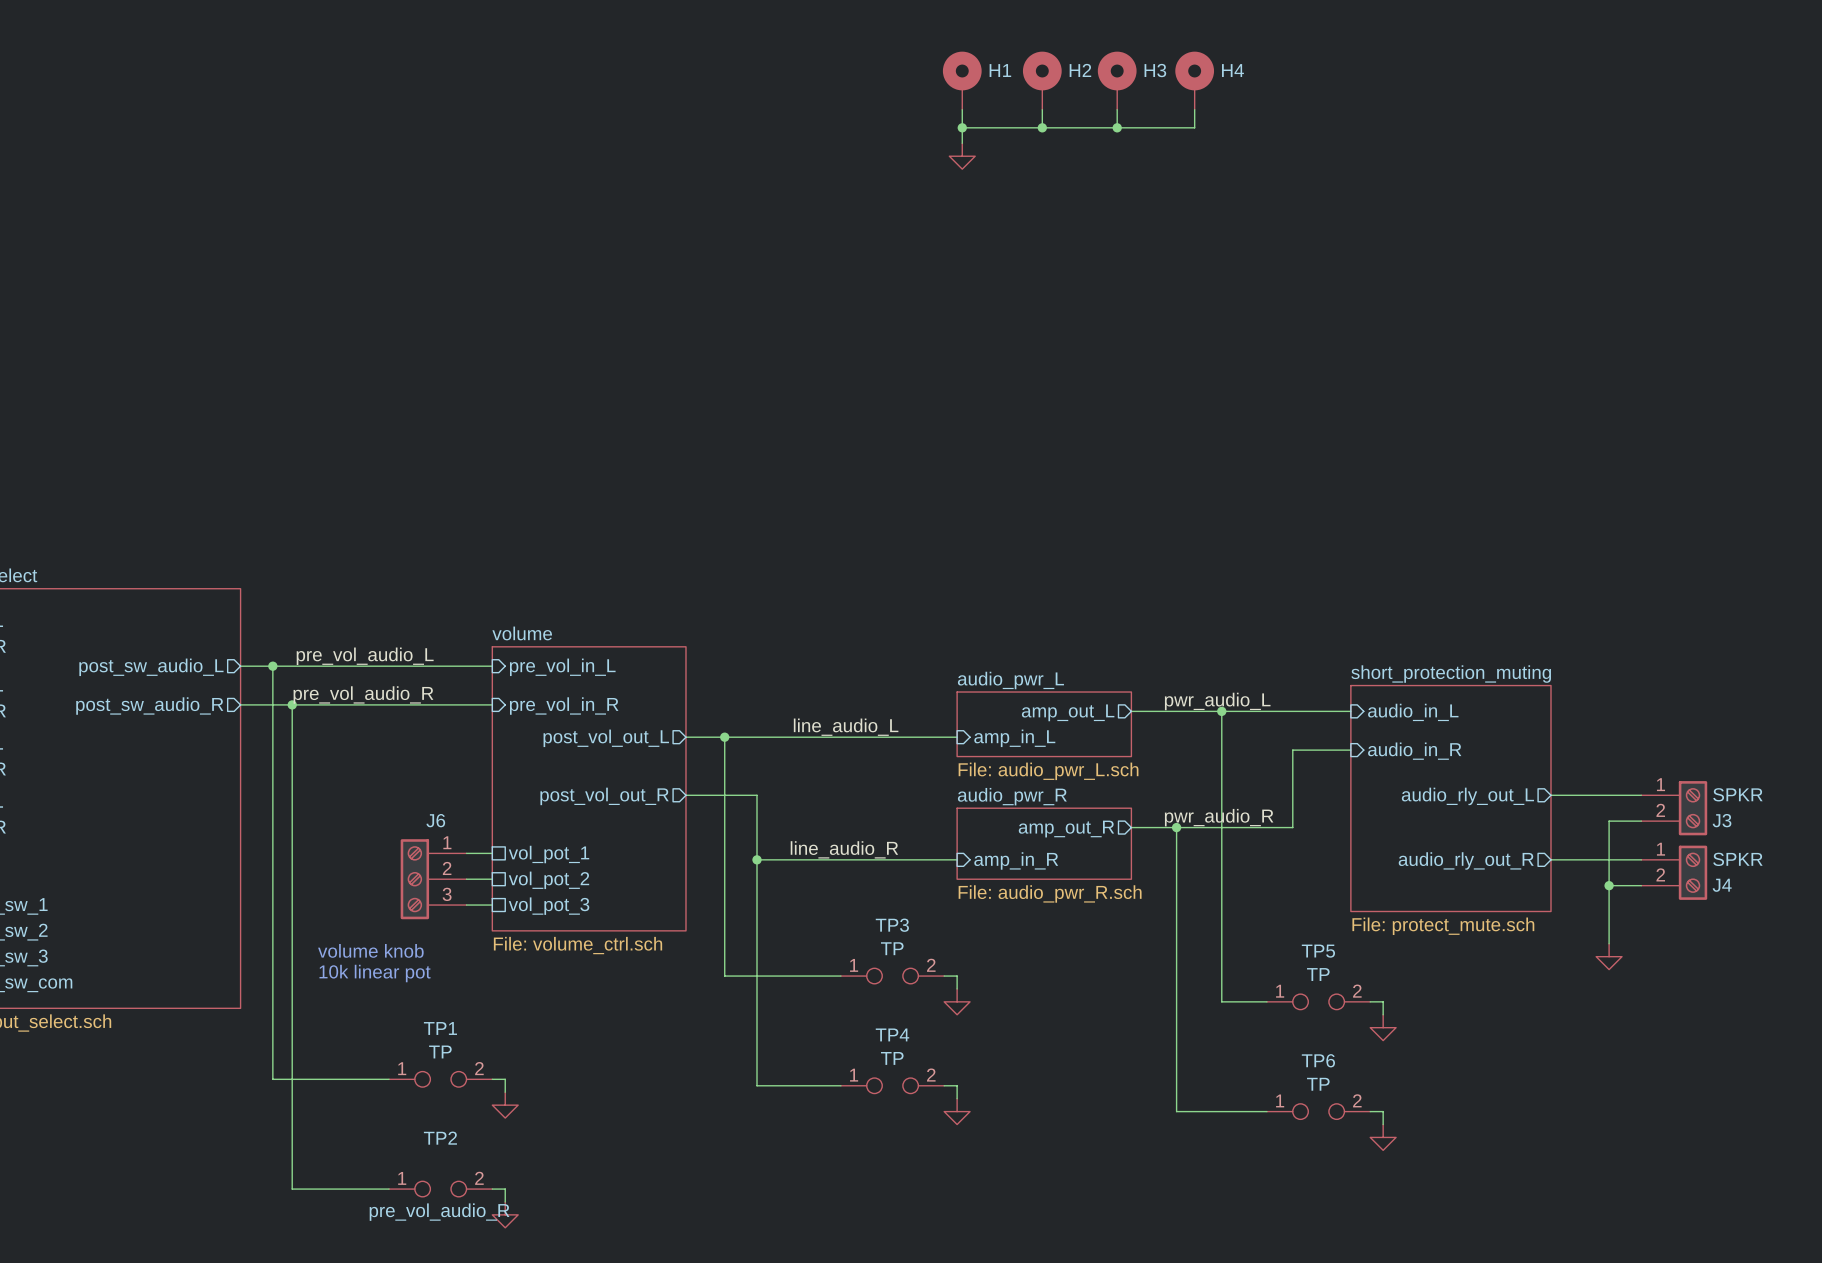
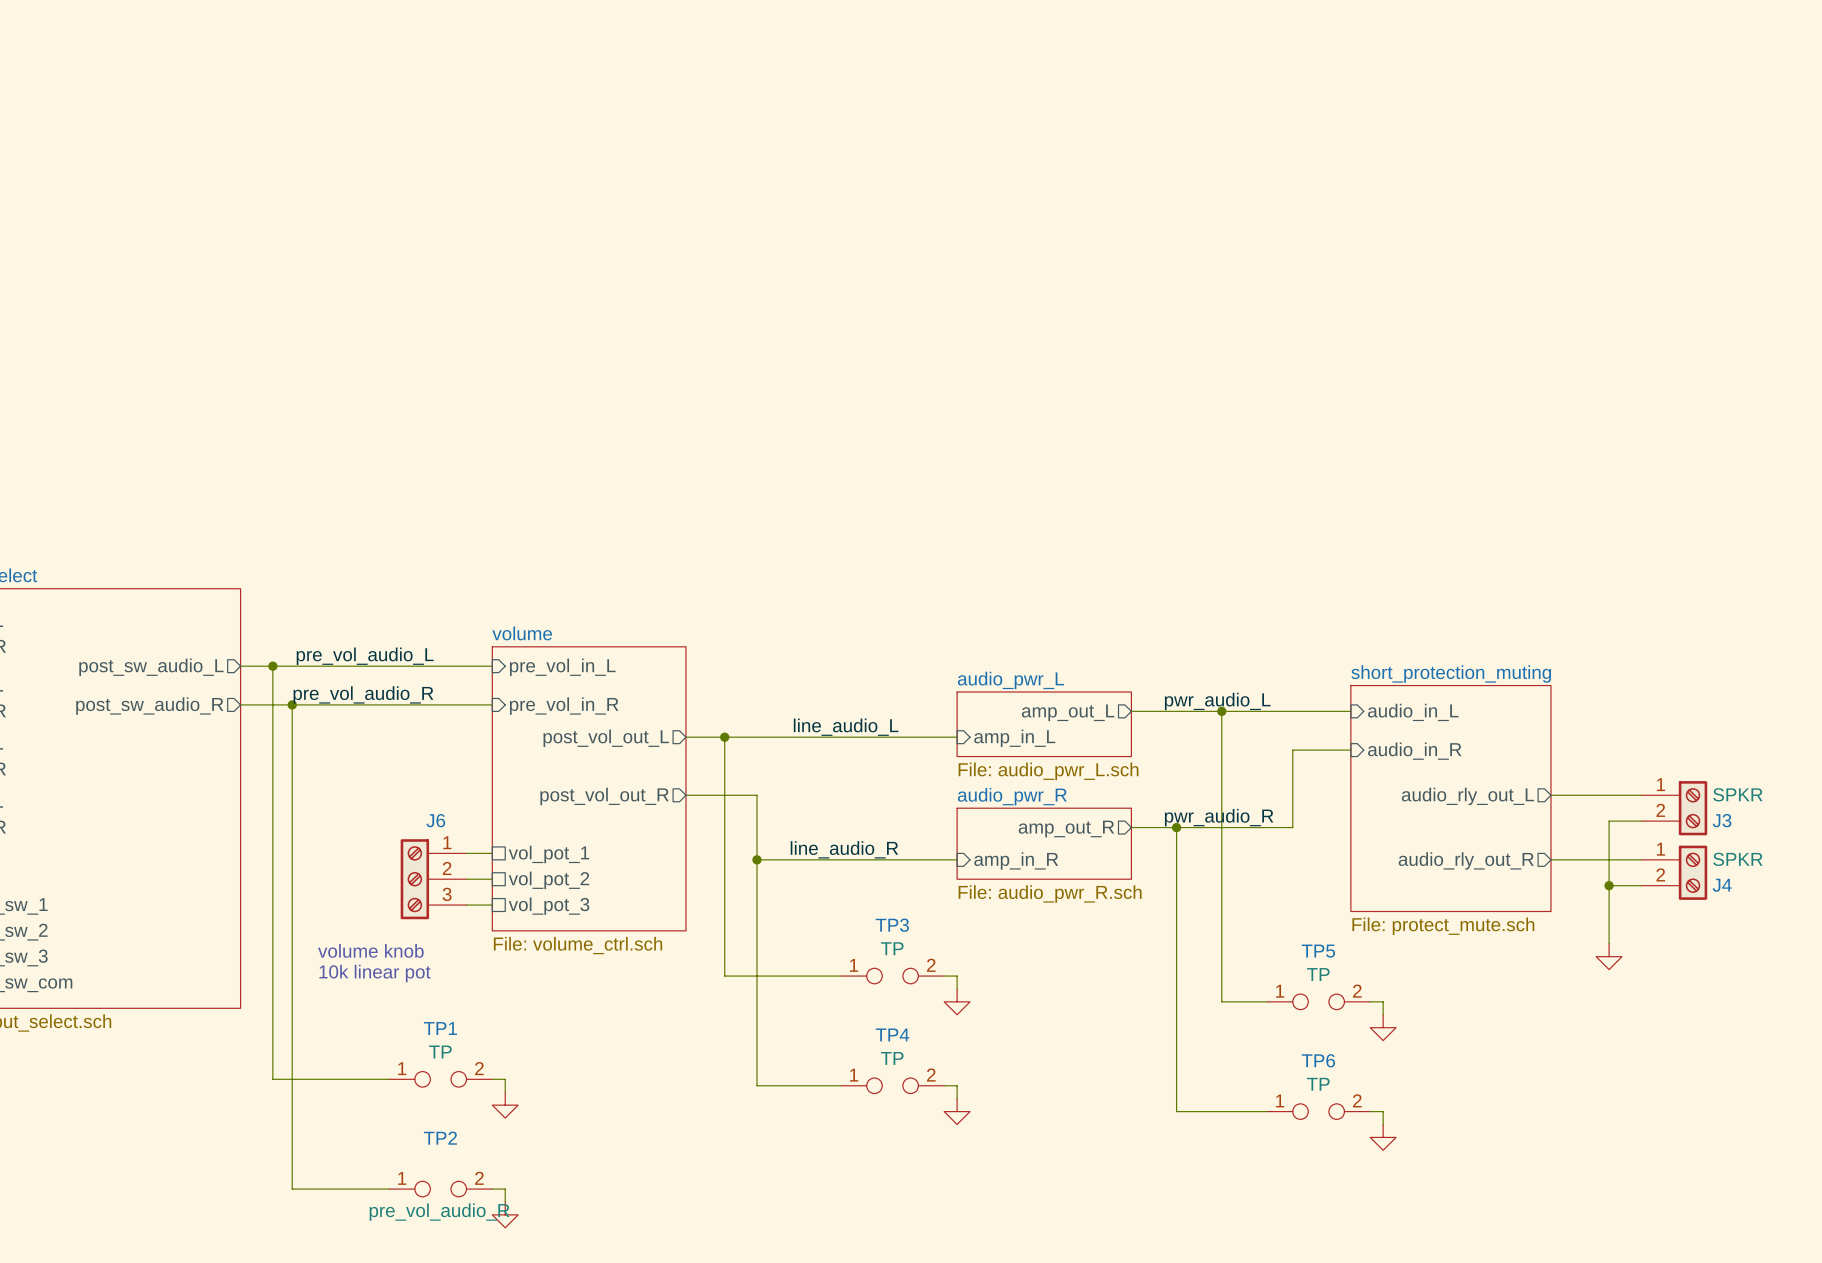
H1: (962, 80) -> none
H2: (1042, 80) -> none
H3: (1117, 80) -> none
H4: (1194, 80) -> none
wire: (962, 109) (962, 143) -> none
wire: (1042, 109) (1042, 127) -> none
wire: (1117, 109) (1117, 127) -> none
wire: (1194, 109) (1194, 127) (962, 127) -> none
junction: (962, 127) -> none
junction: (1042, 127) -> none
junction: (1117, 127) -> none
power symbol: (962, 156) -> none

